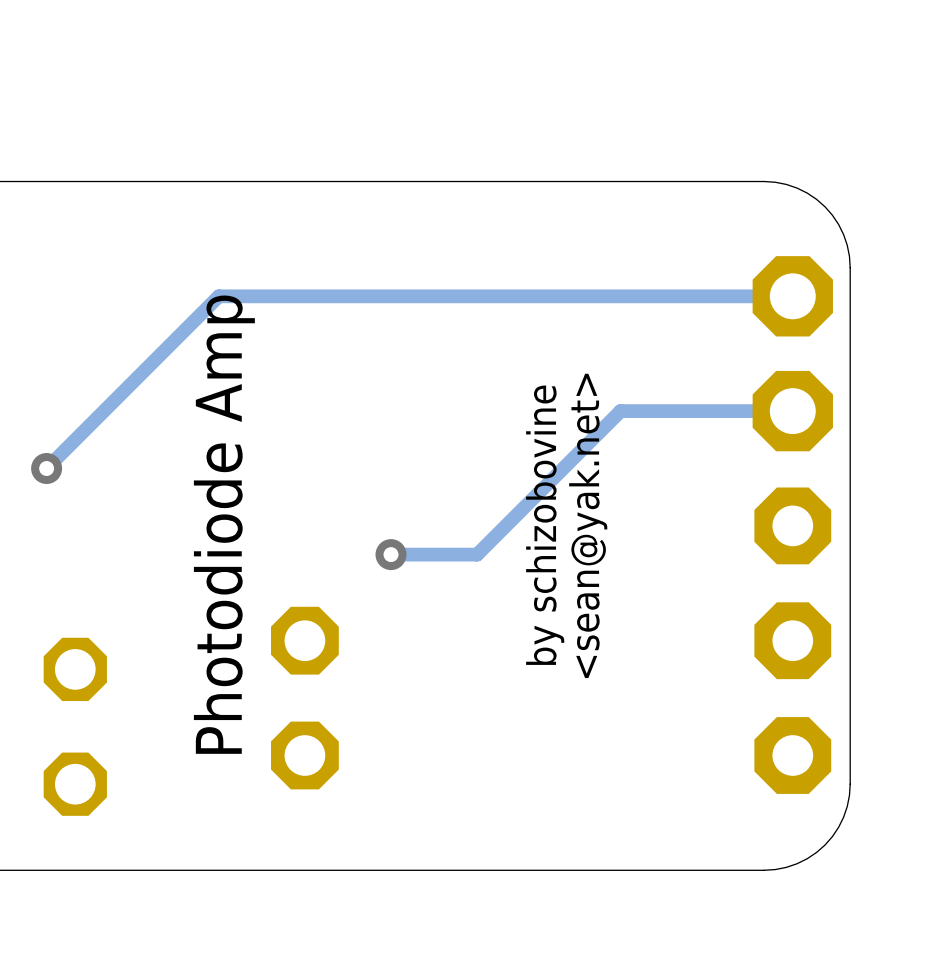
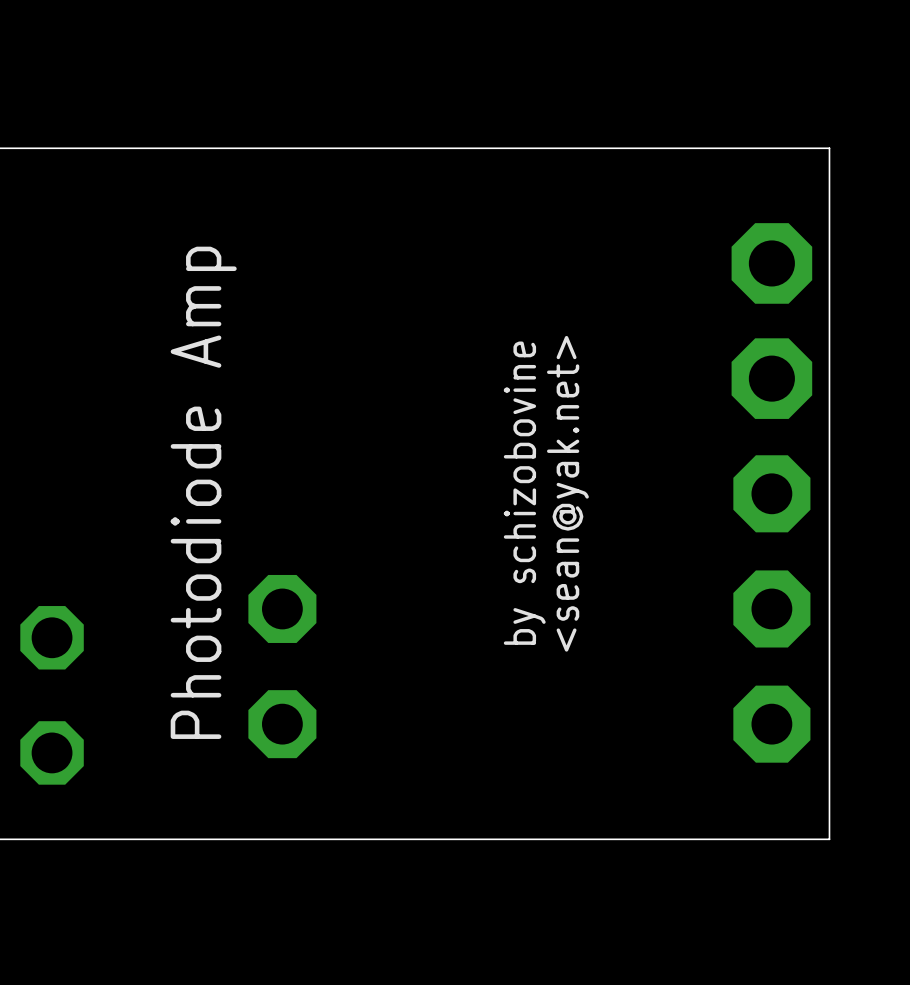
board edge: (764, 181) (797, 188) (824, 206) (843, 234) (850, 267) -> (743, 148) (829, 148) (829, 234)
track: (792, 296) (218, 296) (46, 468) -> none
track: (792, 411) (620, 411) (477, 554) (391, 554) -> none
via: (46, 468) -> none
via: (391, 554) -> none
board edge: (850, 784) (843, 817) (824, 845) (797, 863) (764, 870) -> (829, 752) (829, 839) (743, 839)

